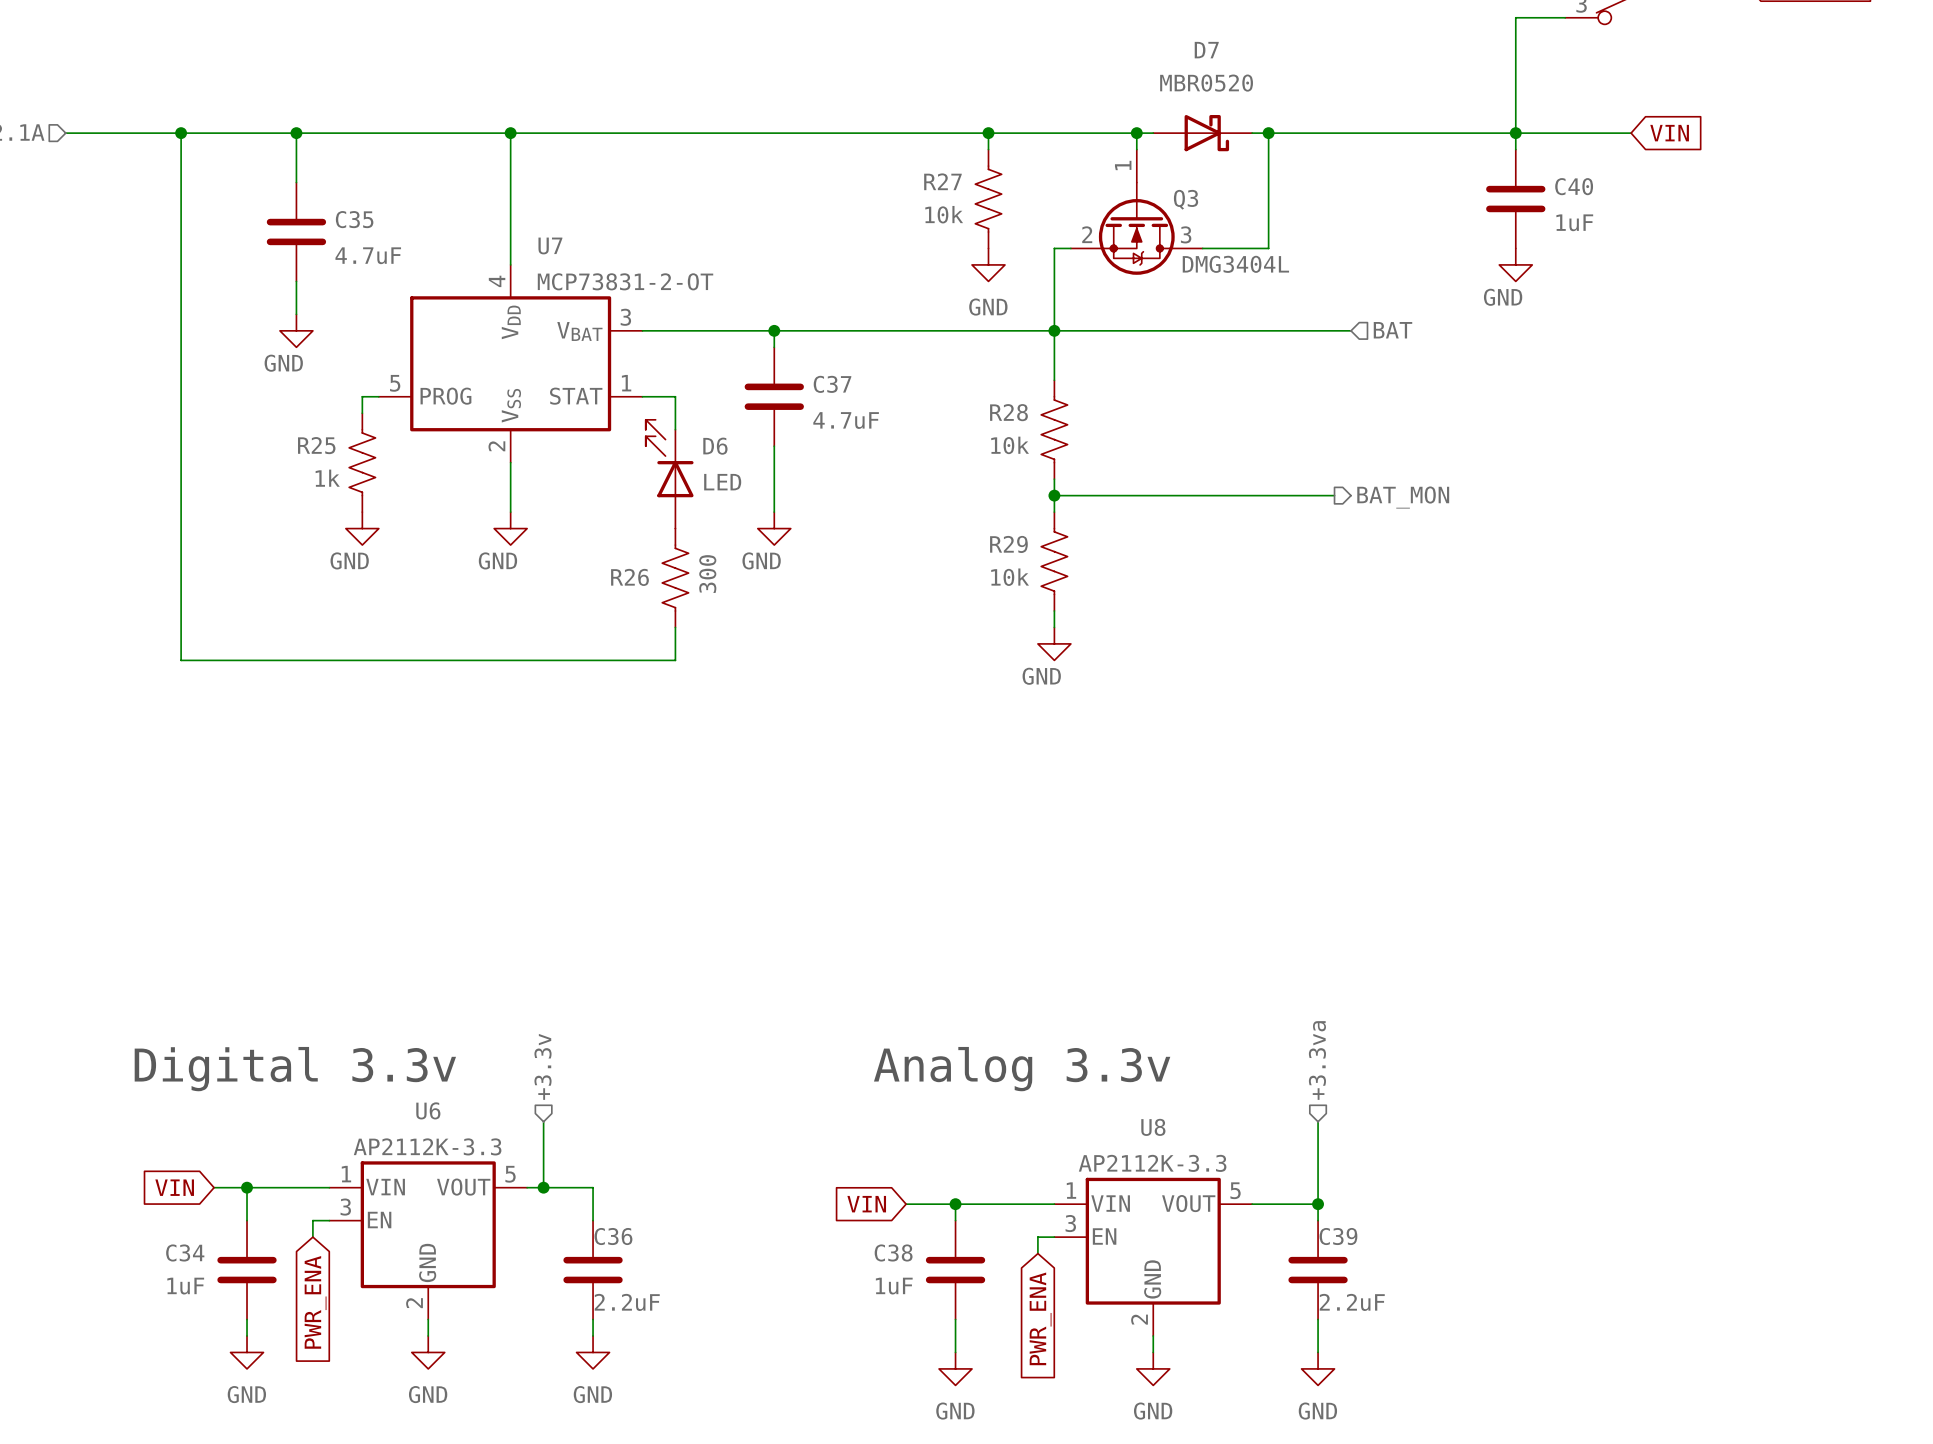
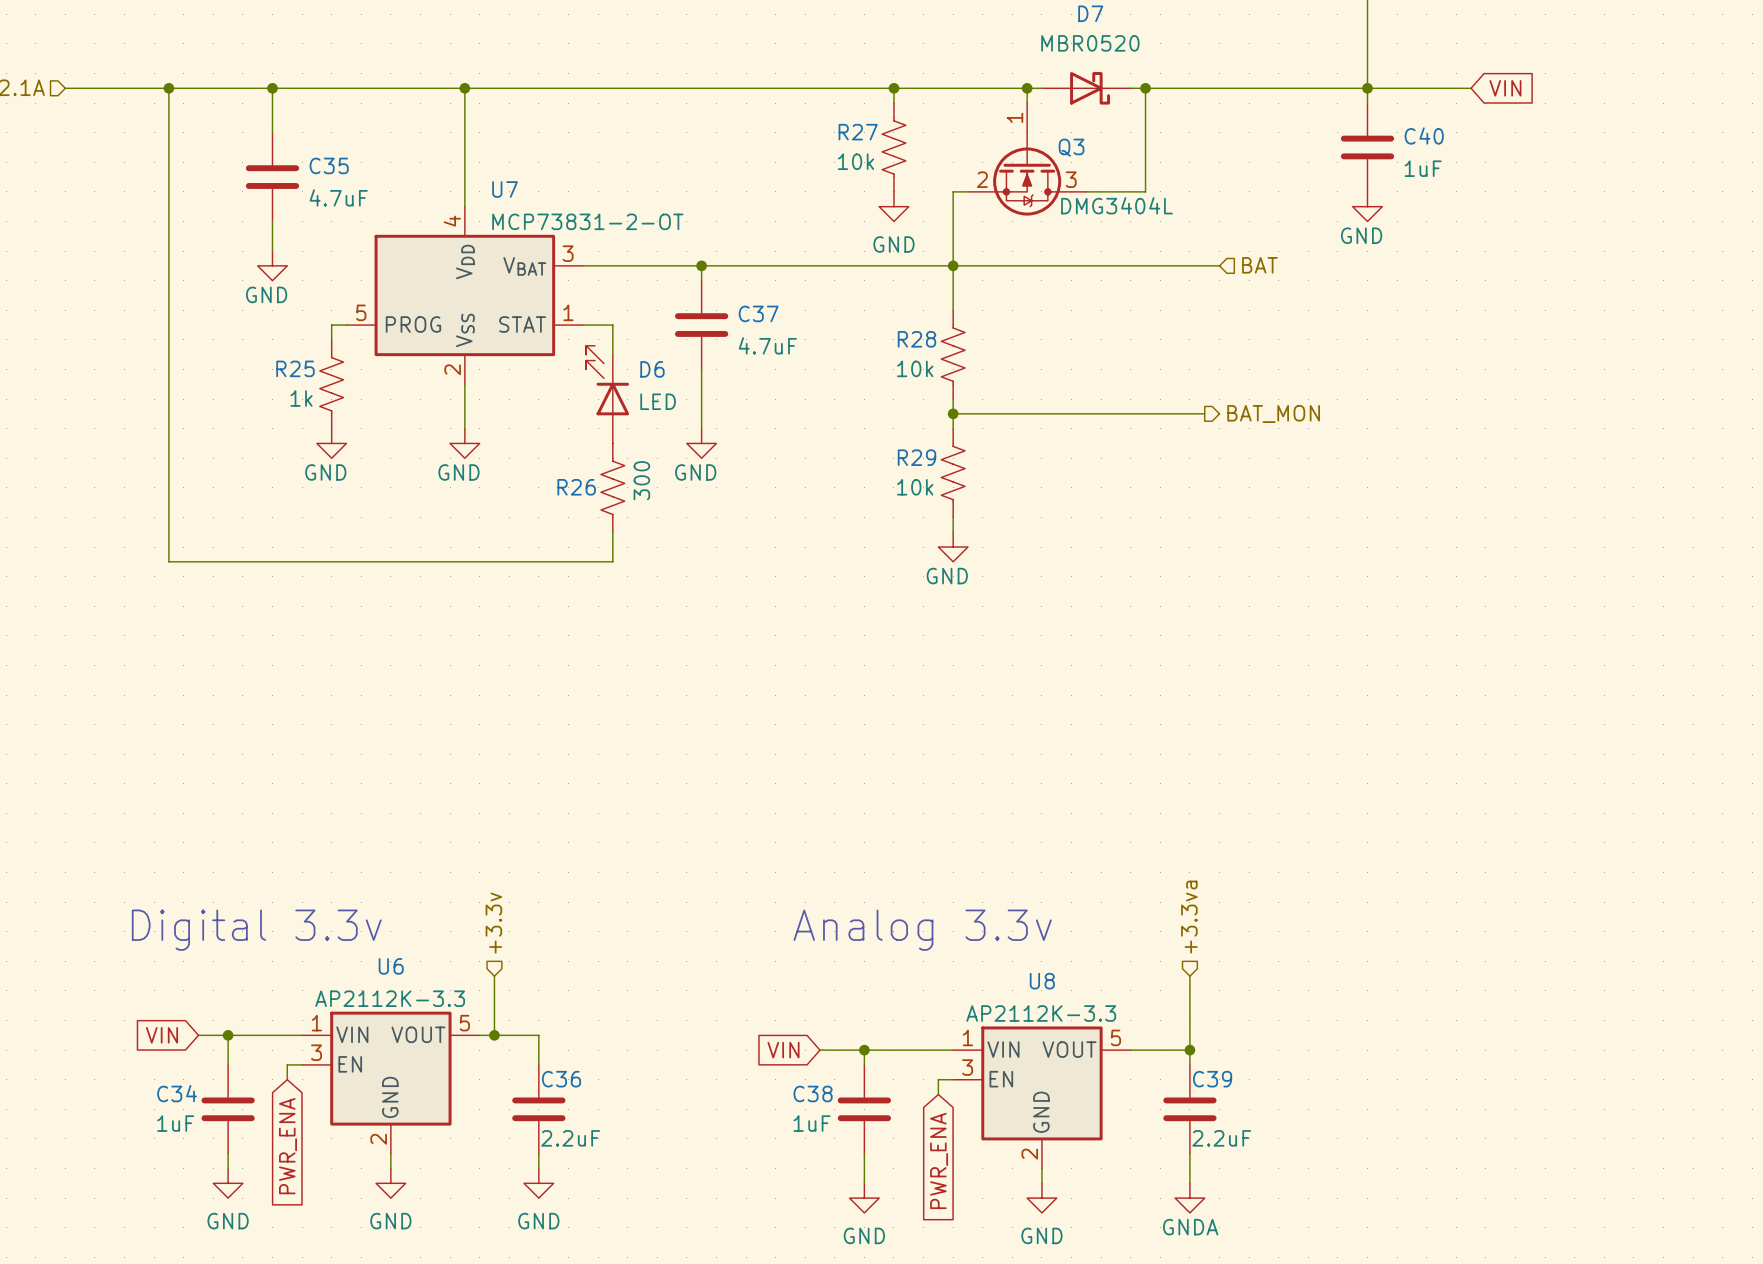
power symbol: GND (1318, 1368) -> GNDA (1189, 1198)

